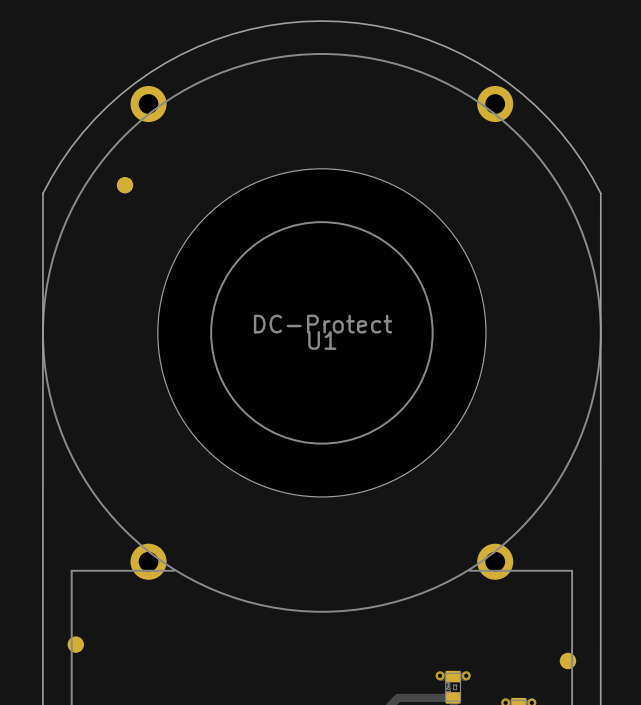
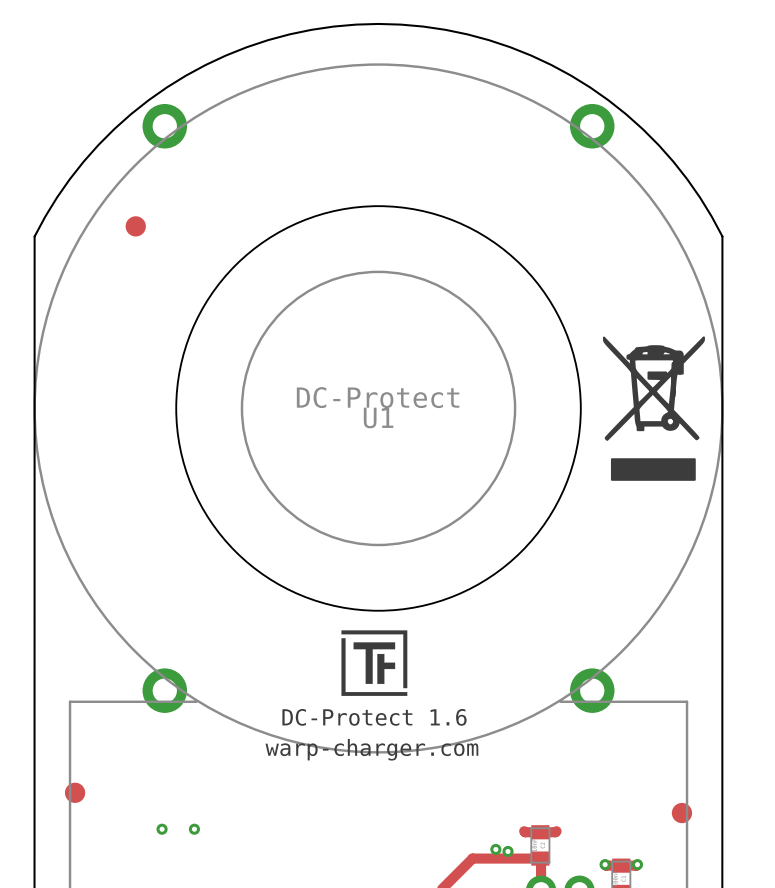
drawing: none -> [602, 336, 705, 481]
drawing: none -> [341, 630, 408, 696]
text: none -> DC-Protect 1.6 (374, 717)
text: none -> warp-charger.com (371, 749)
via: none -> (162, 829)
via: none -> (194, 829)
via: (440, 675) -> none
via: (466, 675) -> none
via: none -> (495, 849)
via: none -> (507, 851)

